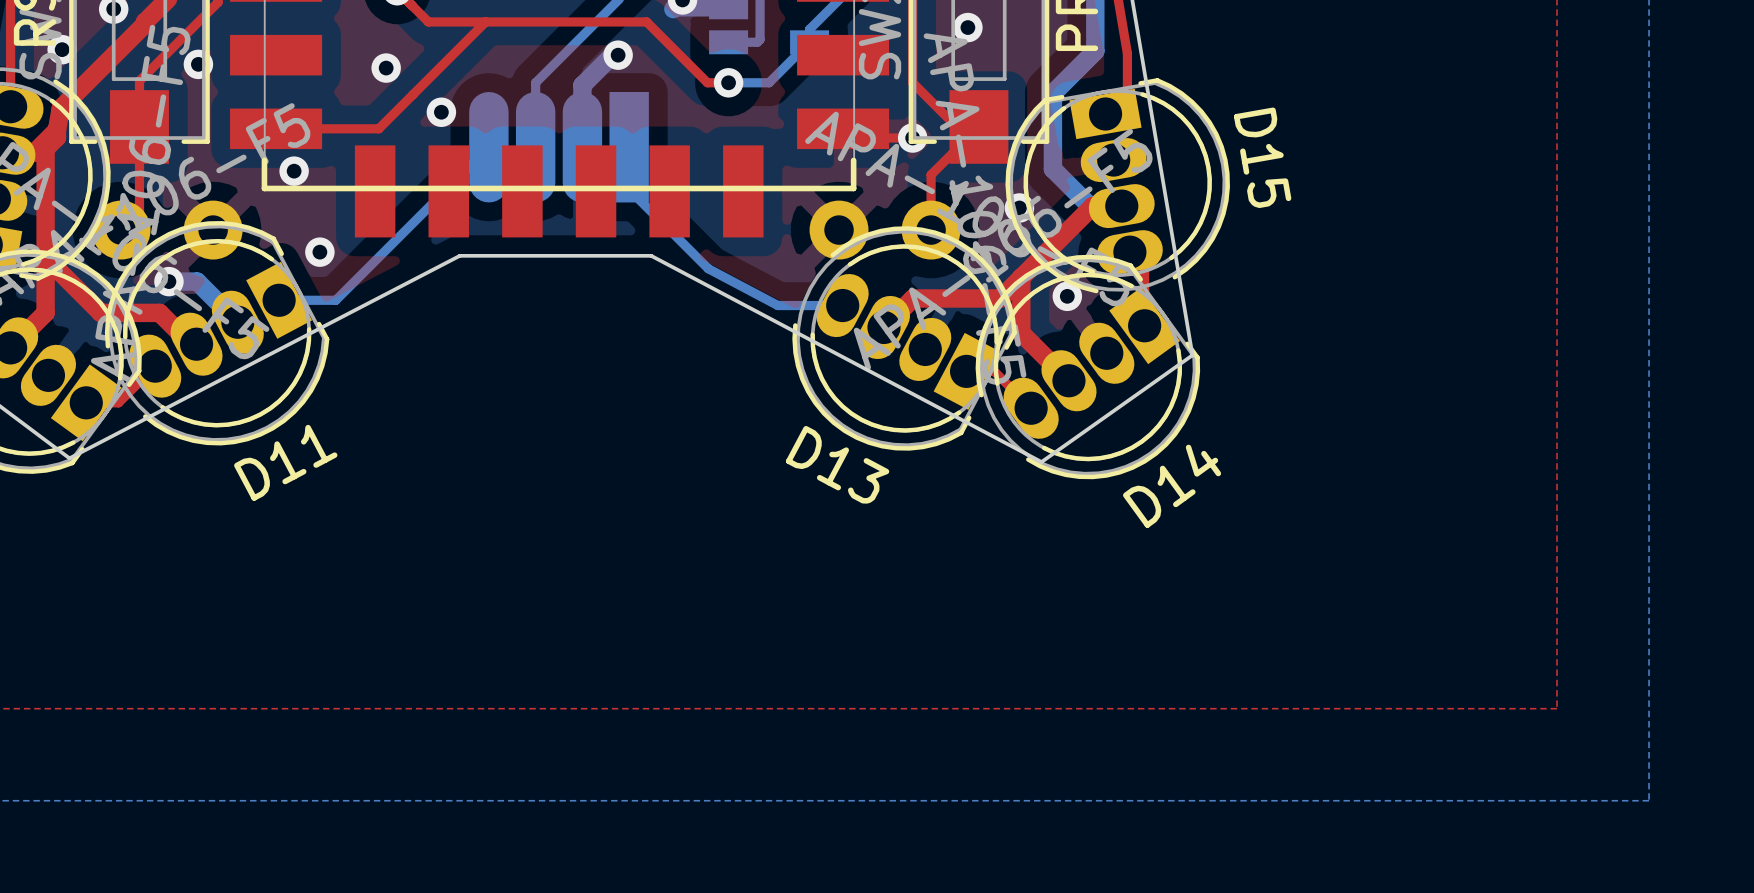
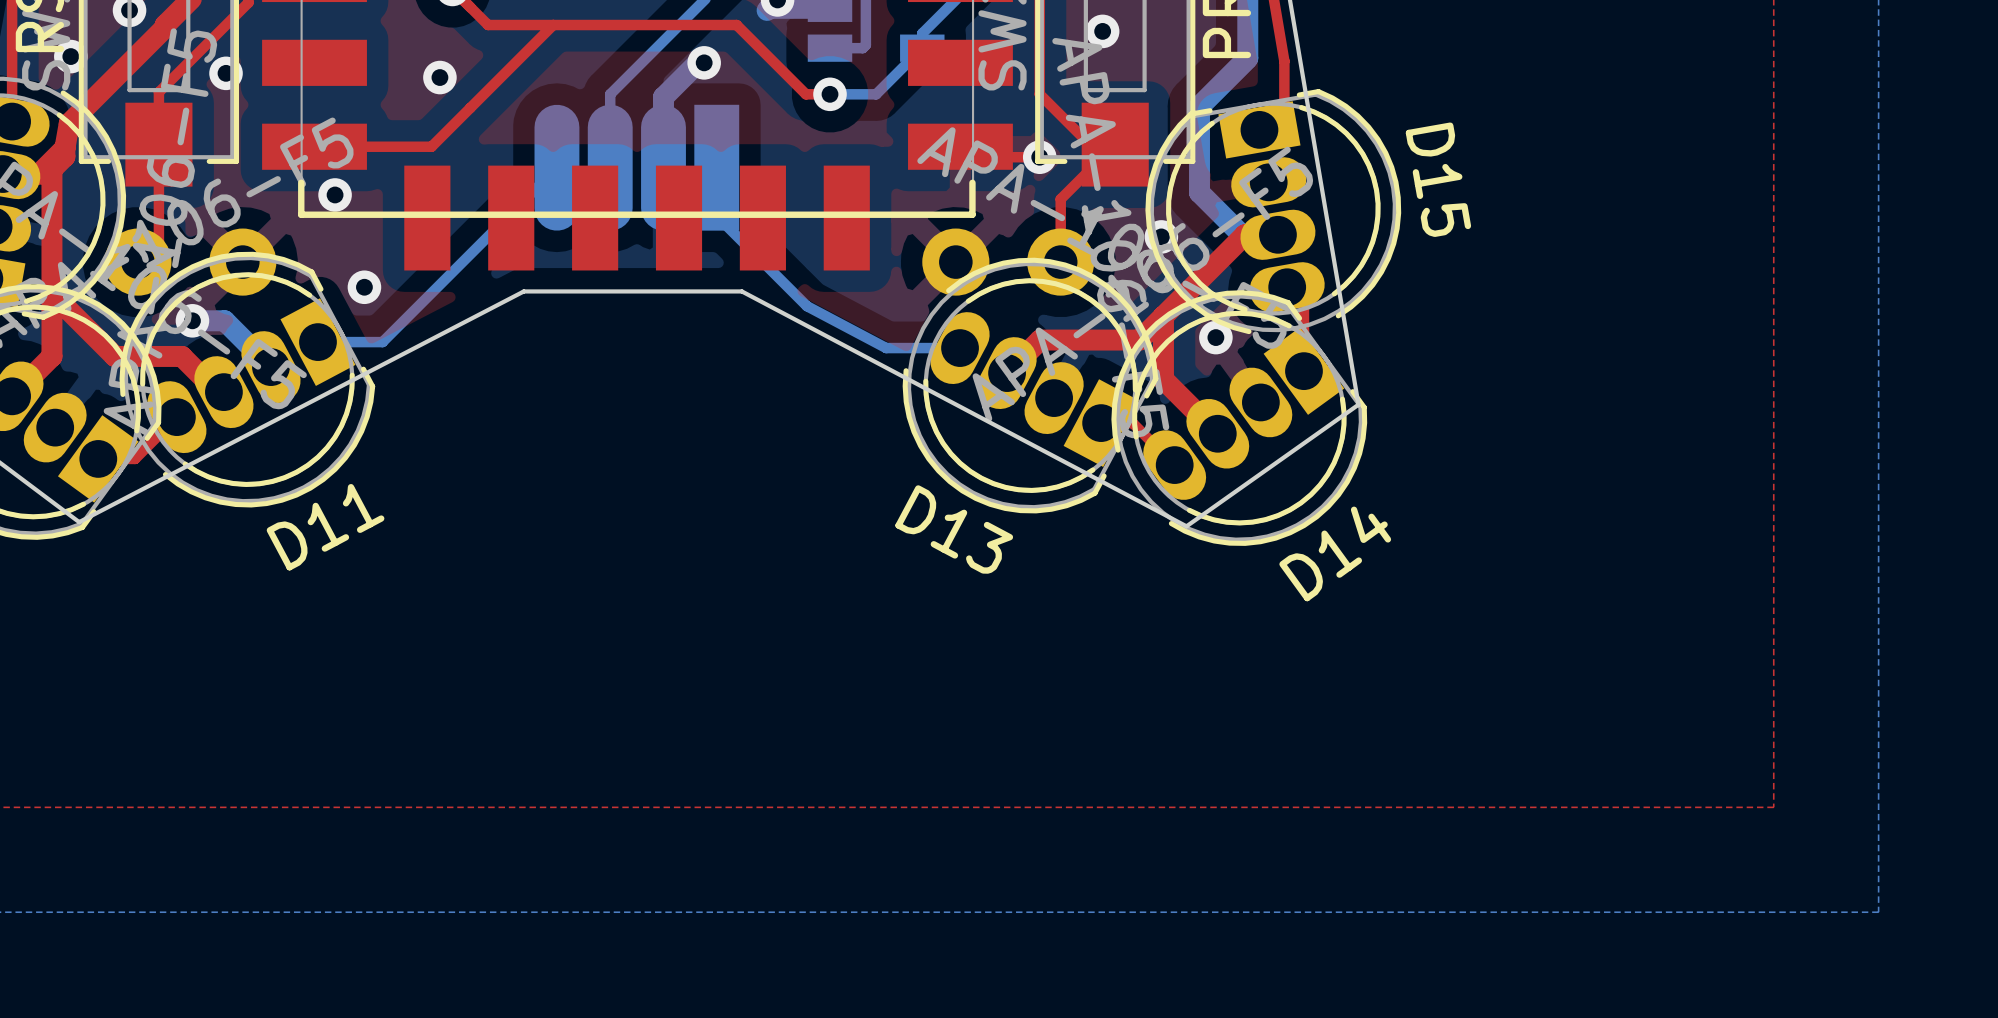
via: (441, 112) -> none

